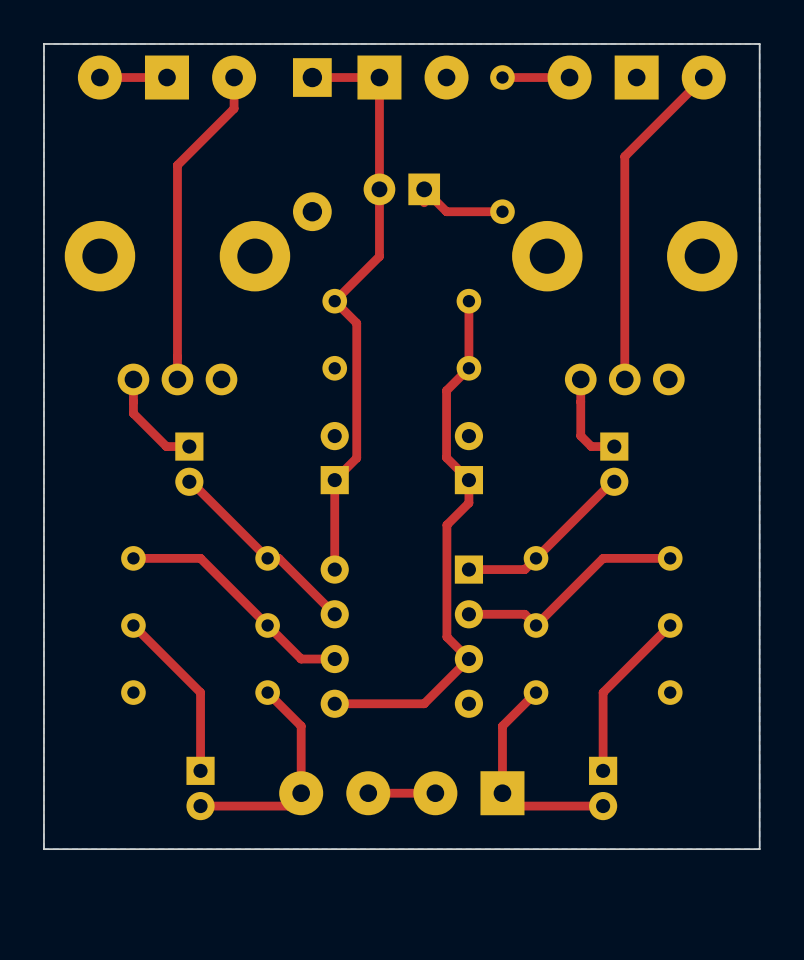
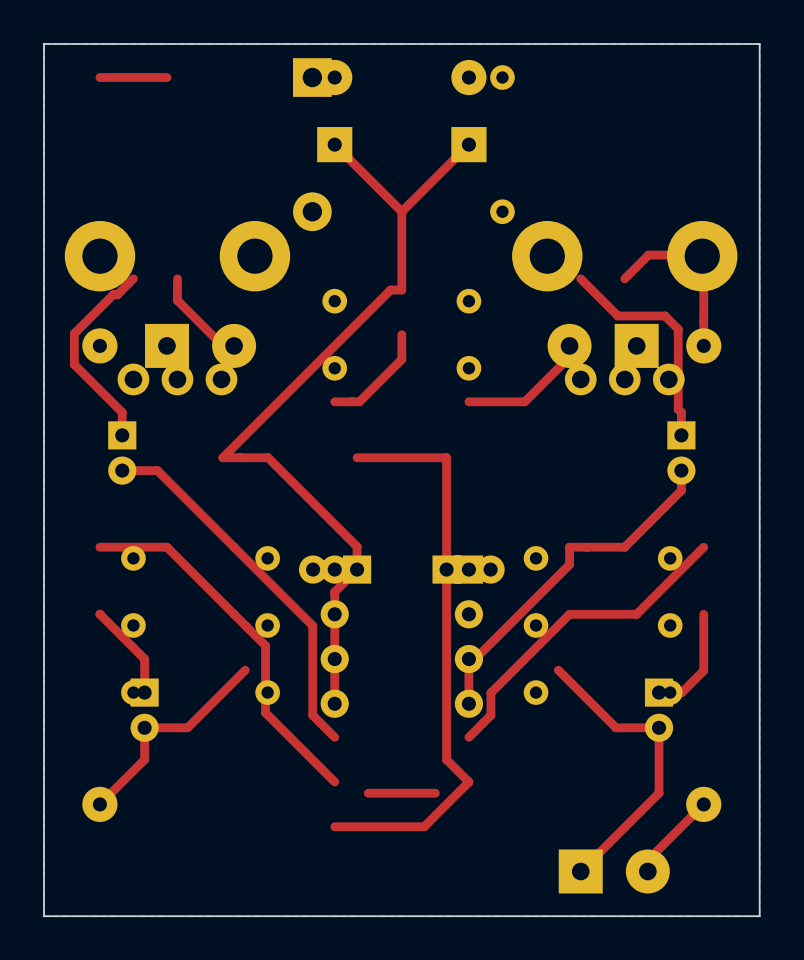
part: (99, 77) -> none
part: (200, 77) -> none
top track: (234, 77) (234, 108) (177, 165) (177, 278) -> none
top track: (312, 77) (379, 77) (379, 256) (334, 301) (356, 323) (356, 458) (334, 480) (334, 569) -> none
part: (413, 77) -> none
top track: (569, 77) (502, 77) -> none
part: (603, 77) -> none
top track: (703, 77) (624, 156) (624, 379) -> none
part: (703, 77) -> none
part: none -> (334, 111)
part: none -> (468, 111)
top track: none -> (334, 144) (401, 211)
top track: none -> (468, 144) (401, 211)
part: (401, 189) -> none
top track: (424, 202) (424, 189) (446, 211) (502, 211) -> none
top track: none -> (401, 211) (401, 290) (390, 290) (222, 457) (268, 457) (357, 546) (357, 569) (334, 591) (334, 692)
top track: none -> (133, 278) (117, 294) (113, 294) (74, 333) (74, 364) (122, 412) (122, 435)
top track: none -> (580, 278) (617, 315) (665, 315) (678, 329) (678, 409) (681, 412) (681, 435)
top track: none -> (624, 278) (648, 255) (680, 255) (703, 278) (703, 345)
top track: (177, 300) (177, 379) -> (177, 300) (222, 345)
top track: (468, 301) (468, 368) (446, 390) (446, 457) (468, 480) (468, 503) (446, 525) (446, 637) (468, 659) (424, 703) (334, 703) -> none
top track: none -> (401, 334) (401, 359) (359, 401) (334, 401)
part: none -> (99, 345)
part: none -> (200, 345)
top track: none -> (580, 345) (524, 401) (468, 401)
part: none -> (603, 345)
part: none -> (703, 345)
top track: (133, 379) (133, 413) (166, 446) (189, 446) -> none
top track: (580, 379) (580, 435) (591, 446) (614, 446) -> none
top track: none -> (357, 457) (446, 457) (446, 759) (468, 782) (424, 826) (334, 826)
part: (334, 458) -> none
part: (468, 458) -> none
part position: (189, 464) -> (122, 452)
part position: (614, 464) -> (681, 452)
top track: none -> (122, 470) (157, 470) (312, 625) (312, 715) (334, 737)
top track: none -> (681, 470) (681, 490) (624, 547) (569, 547) (569, 564) (468, 665) (468, 692)
top track: (189, 481) (267, 558) (278, 558) (334, 614) -> none
top track: (614, 481) (524, 569) (468, 569) -> none
top track: none -> (99, 547) (166, 547) (265, 645) (265, 712) (334, 782)
top track: none -> (703, 547) (636, 614) (569, 614) (490, 692) (490, 715) (468, 737)
top track: (133, 558) (200, 558) (301, 659) (334, 659) -> none
top track: (670, 558) (603, 558) (536, 625) (524, 614) (468, 614) -> none
part: none -> (335, 569)
part: none -> (468, 569)
top track: none -> (100, 614) (144, 659) (144, 692)
top track: none -> (703, 614) (703, 670) (681, 692) (659, 692)
top track: (133, 625) (200, 692) (200, 770) -> none
top track: (670, 625) (603, 692) (603, 770) -> none
top track: none -> (245, 670) (187, 727) (144, 727) (144, 759) (99, 804)
top track: none -> (558, 670) (615, 727) (659, 727) (659, 793) (580, 871)
top track: (267, 692) (301, 726) (301, 793) (288, 806) (200, 806) -> none
top track: (536, 692) (502, 726) (502, 793) (515, 806) (603, 806) -> none
part position: (200, 788) -> (144, 710)
part position: (603, 788) -> (659, 710)
part: (301, 793) -> none
part: (368, 793) -> none
part rotation: 0° (468, 793) -> 180° (614, 871)
part position: (468, 793) -> (614, 871)
part: none -> (99, 804)
top track: none -> (703, 804) (636, 871)
part: none -> (703, 804)
board edge: (759, 849) (43, 849) -> (759, 849) (759, 916) (43, 916) (43, 849)

